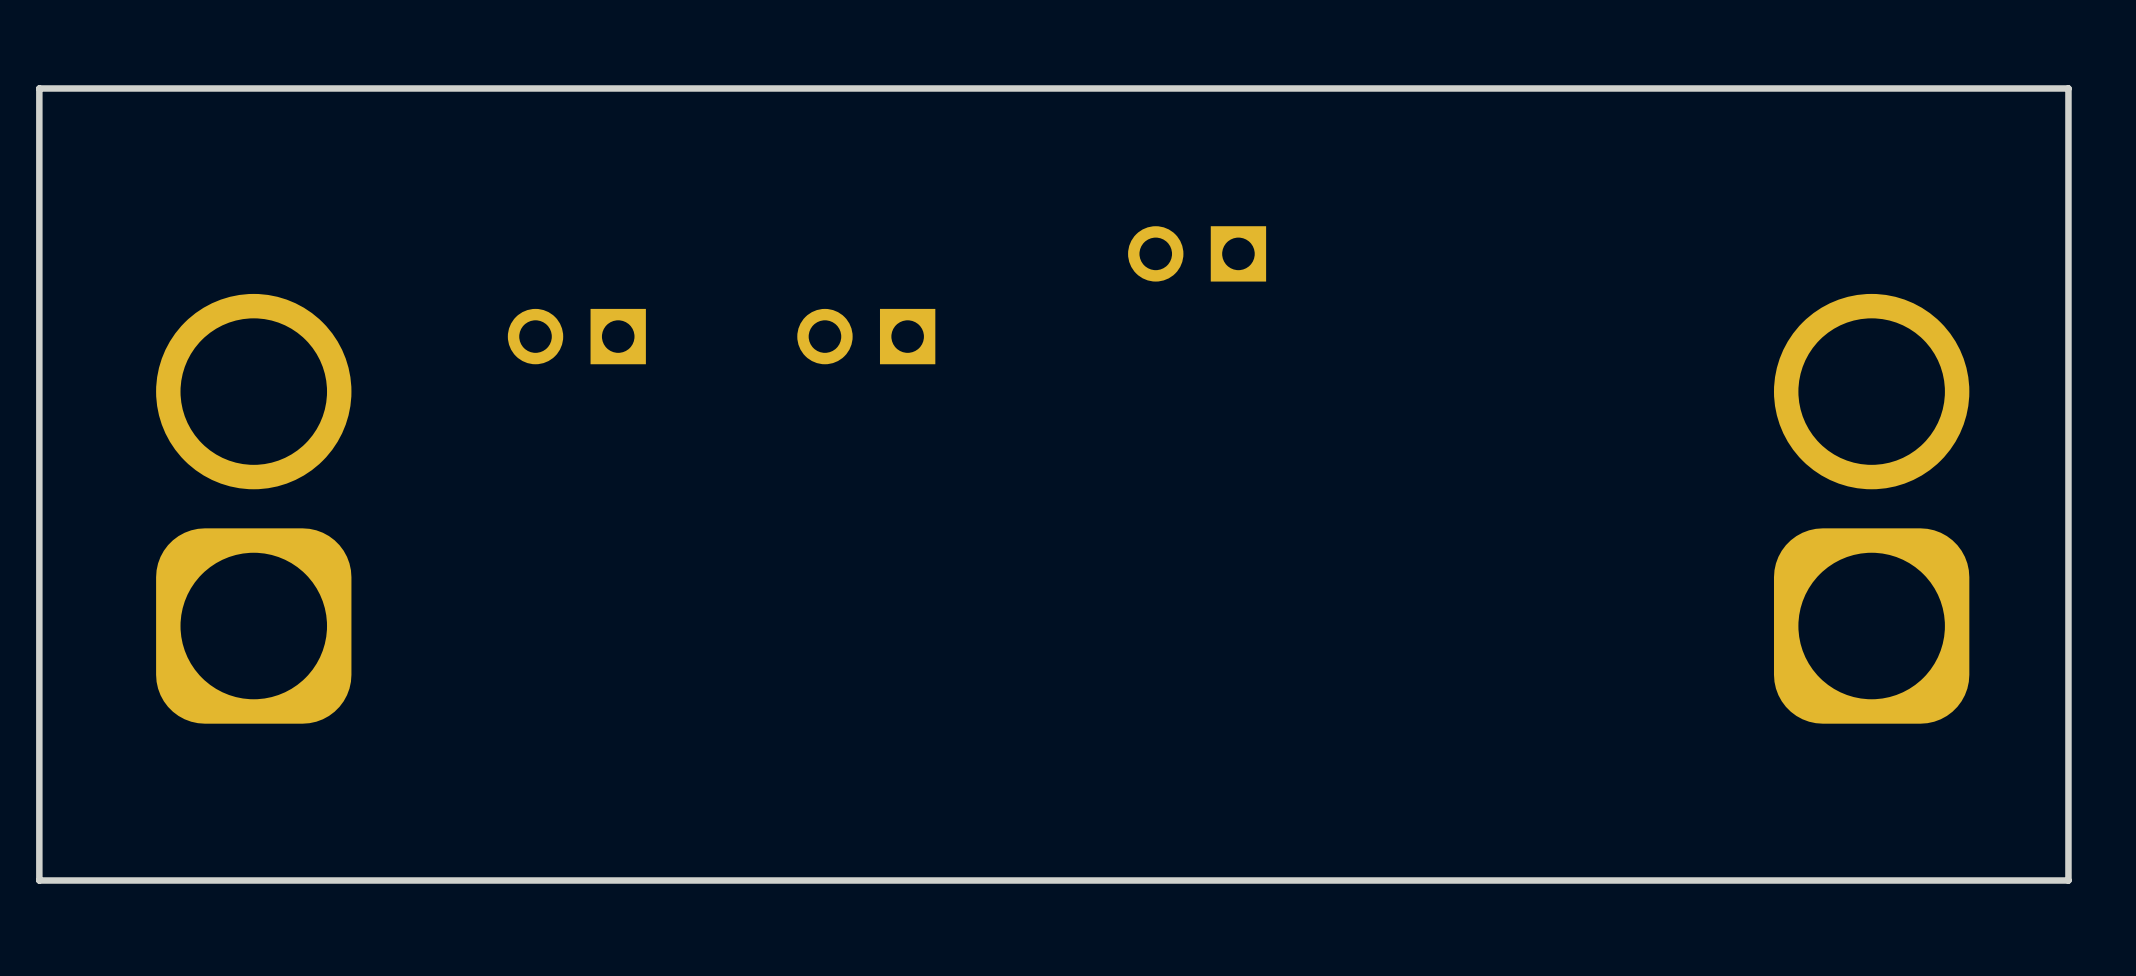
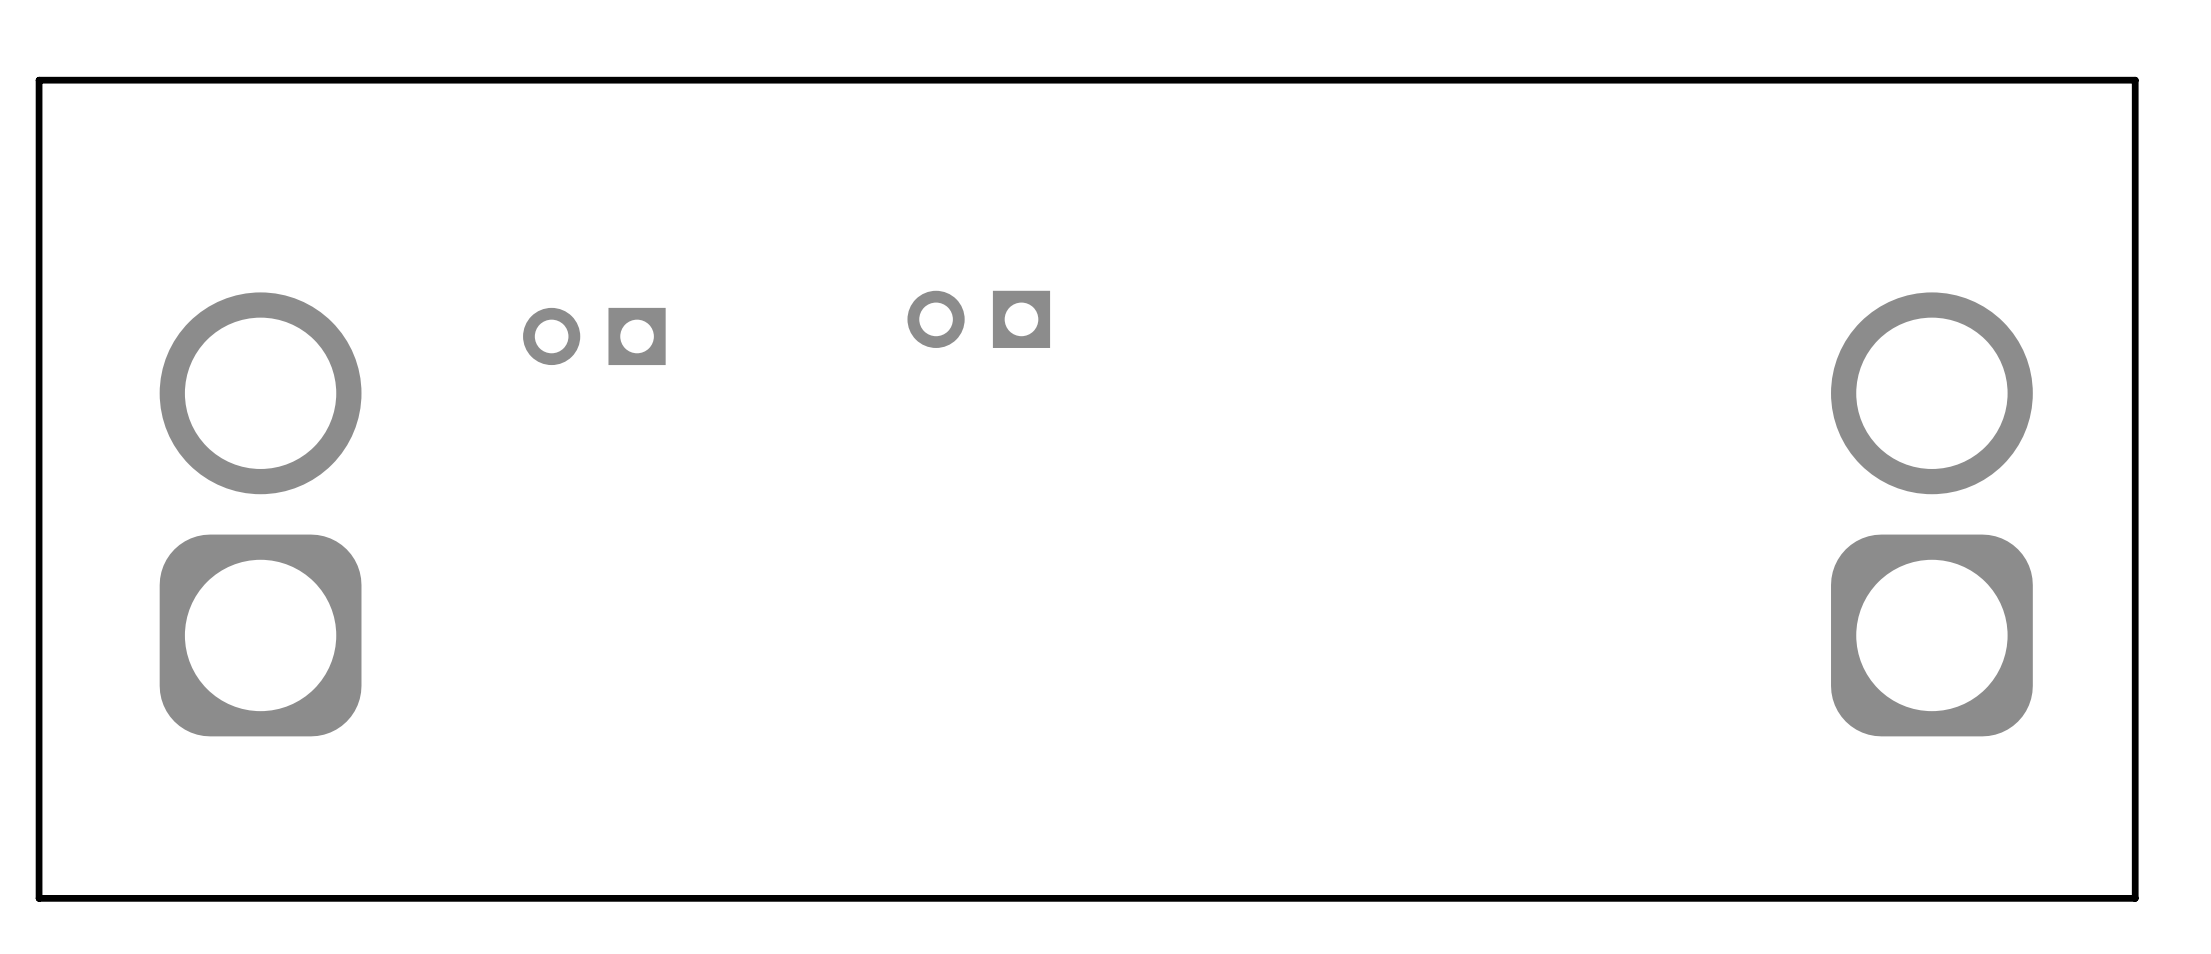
part: (1197, 253) -> none
part position: (866, 336) -> (978, 319)

